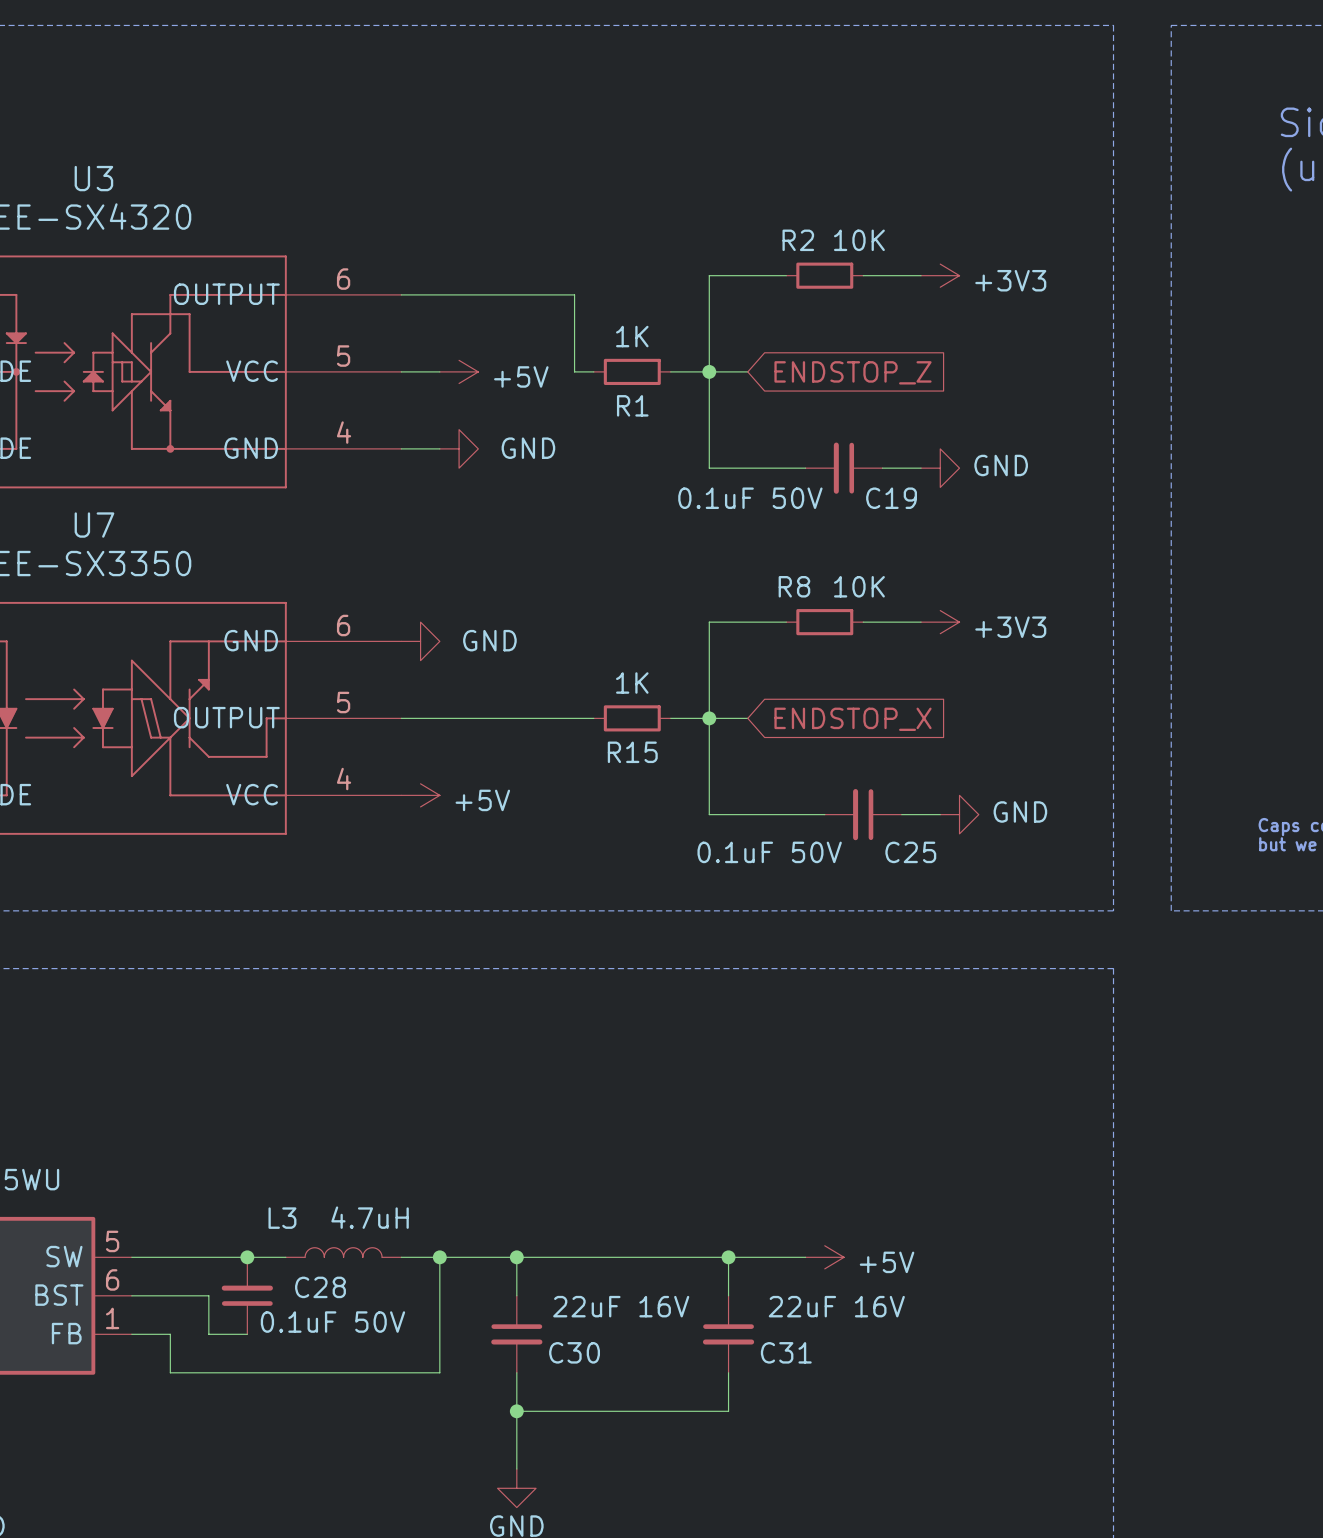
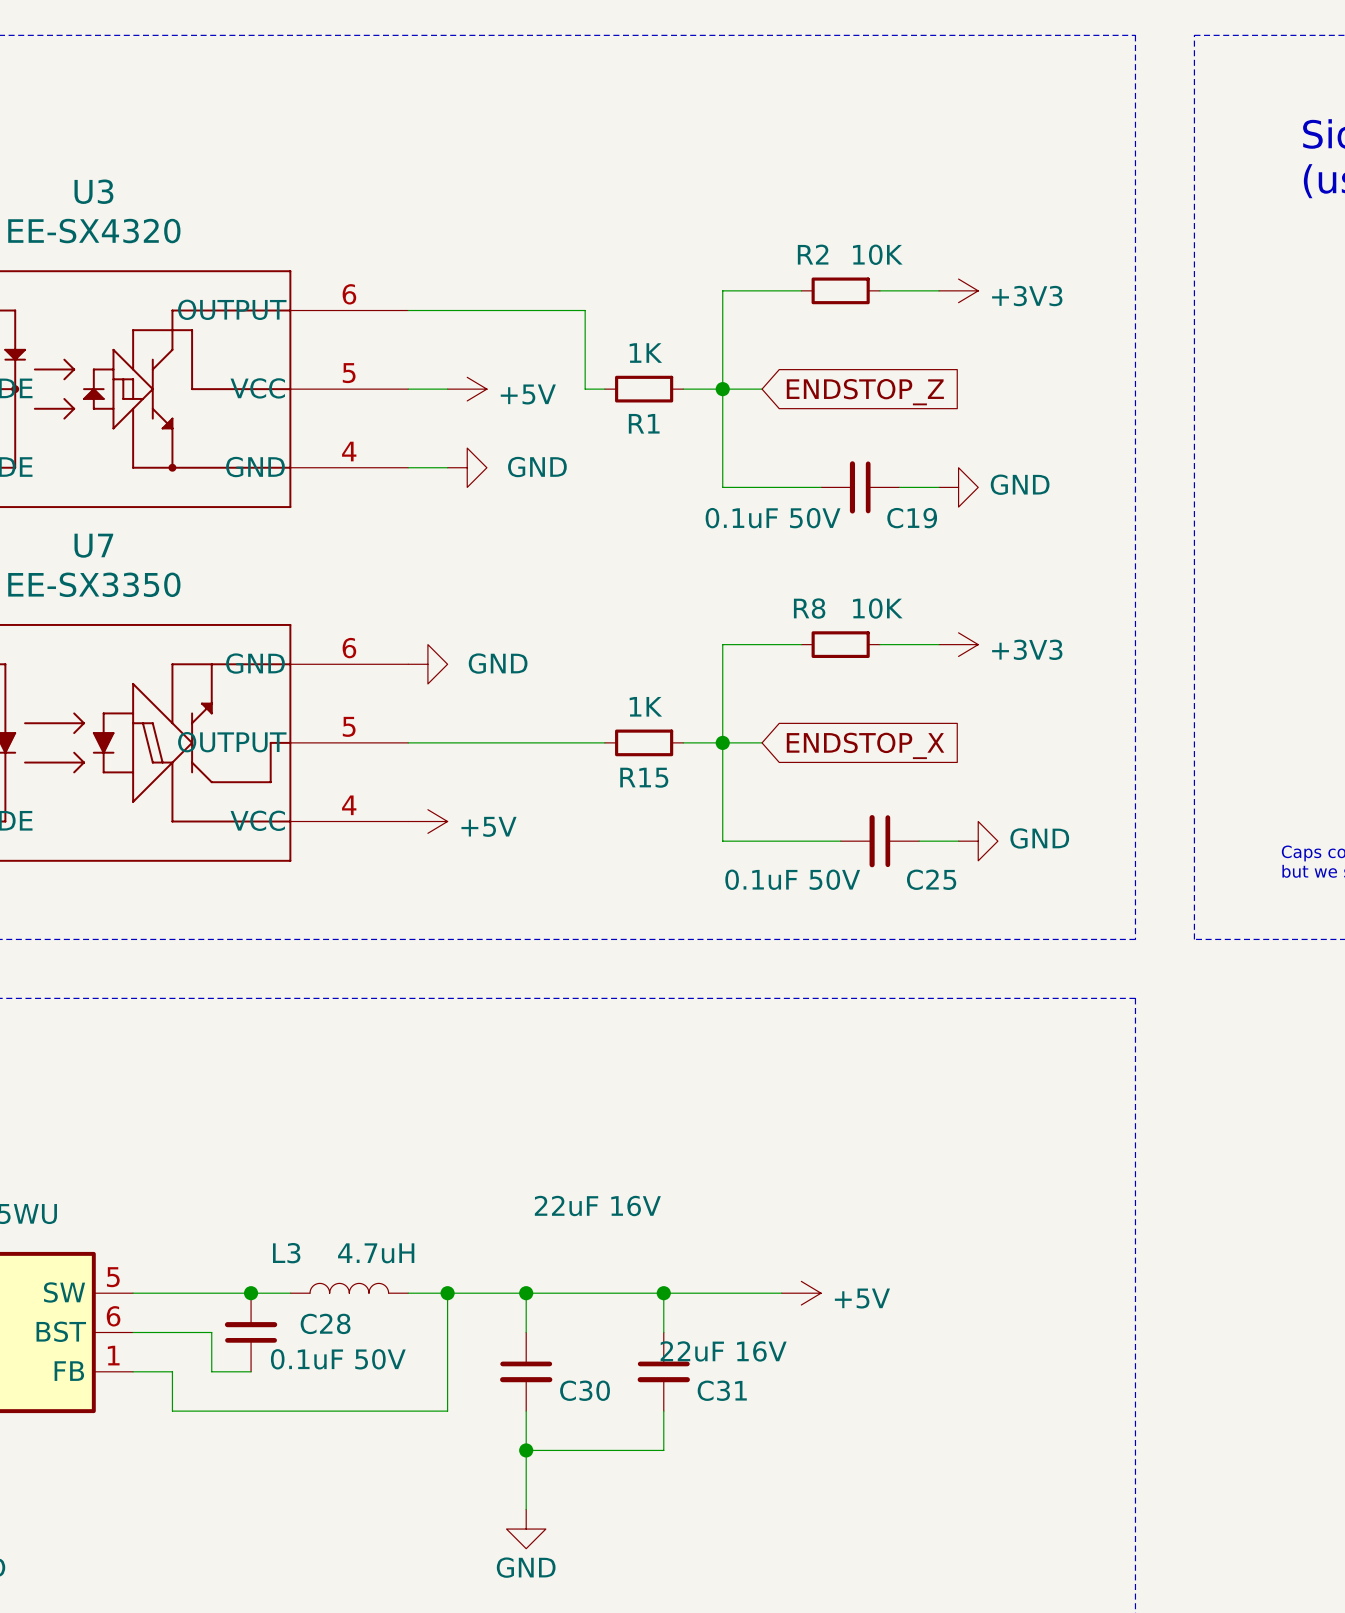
wire: (728, 1257) (728, 1295) -> (663, 1293) (663, 1332)
junction position: (728, 1257) -> (663, 1293)
power symbol position: +5V (824, 1257) -> +5V (801, 1293)
C30 value position: 22uF 16V (621, 1306) -> 22uF 16V (597, 1206)
C31 value position: 22uF 16V (836, 1306) -> 22uF 16V (723, 1351)
C31 position: (728, 1334) -> (663, 1371)
wire: (728, 1372) (728, 1411) (651, 1411) -> (663, 1411) (663, 1450)

